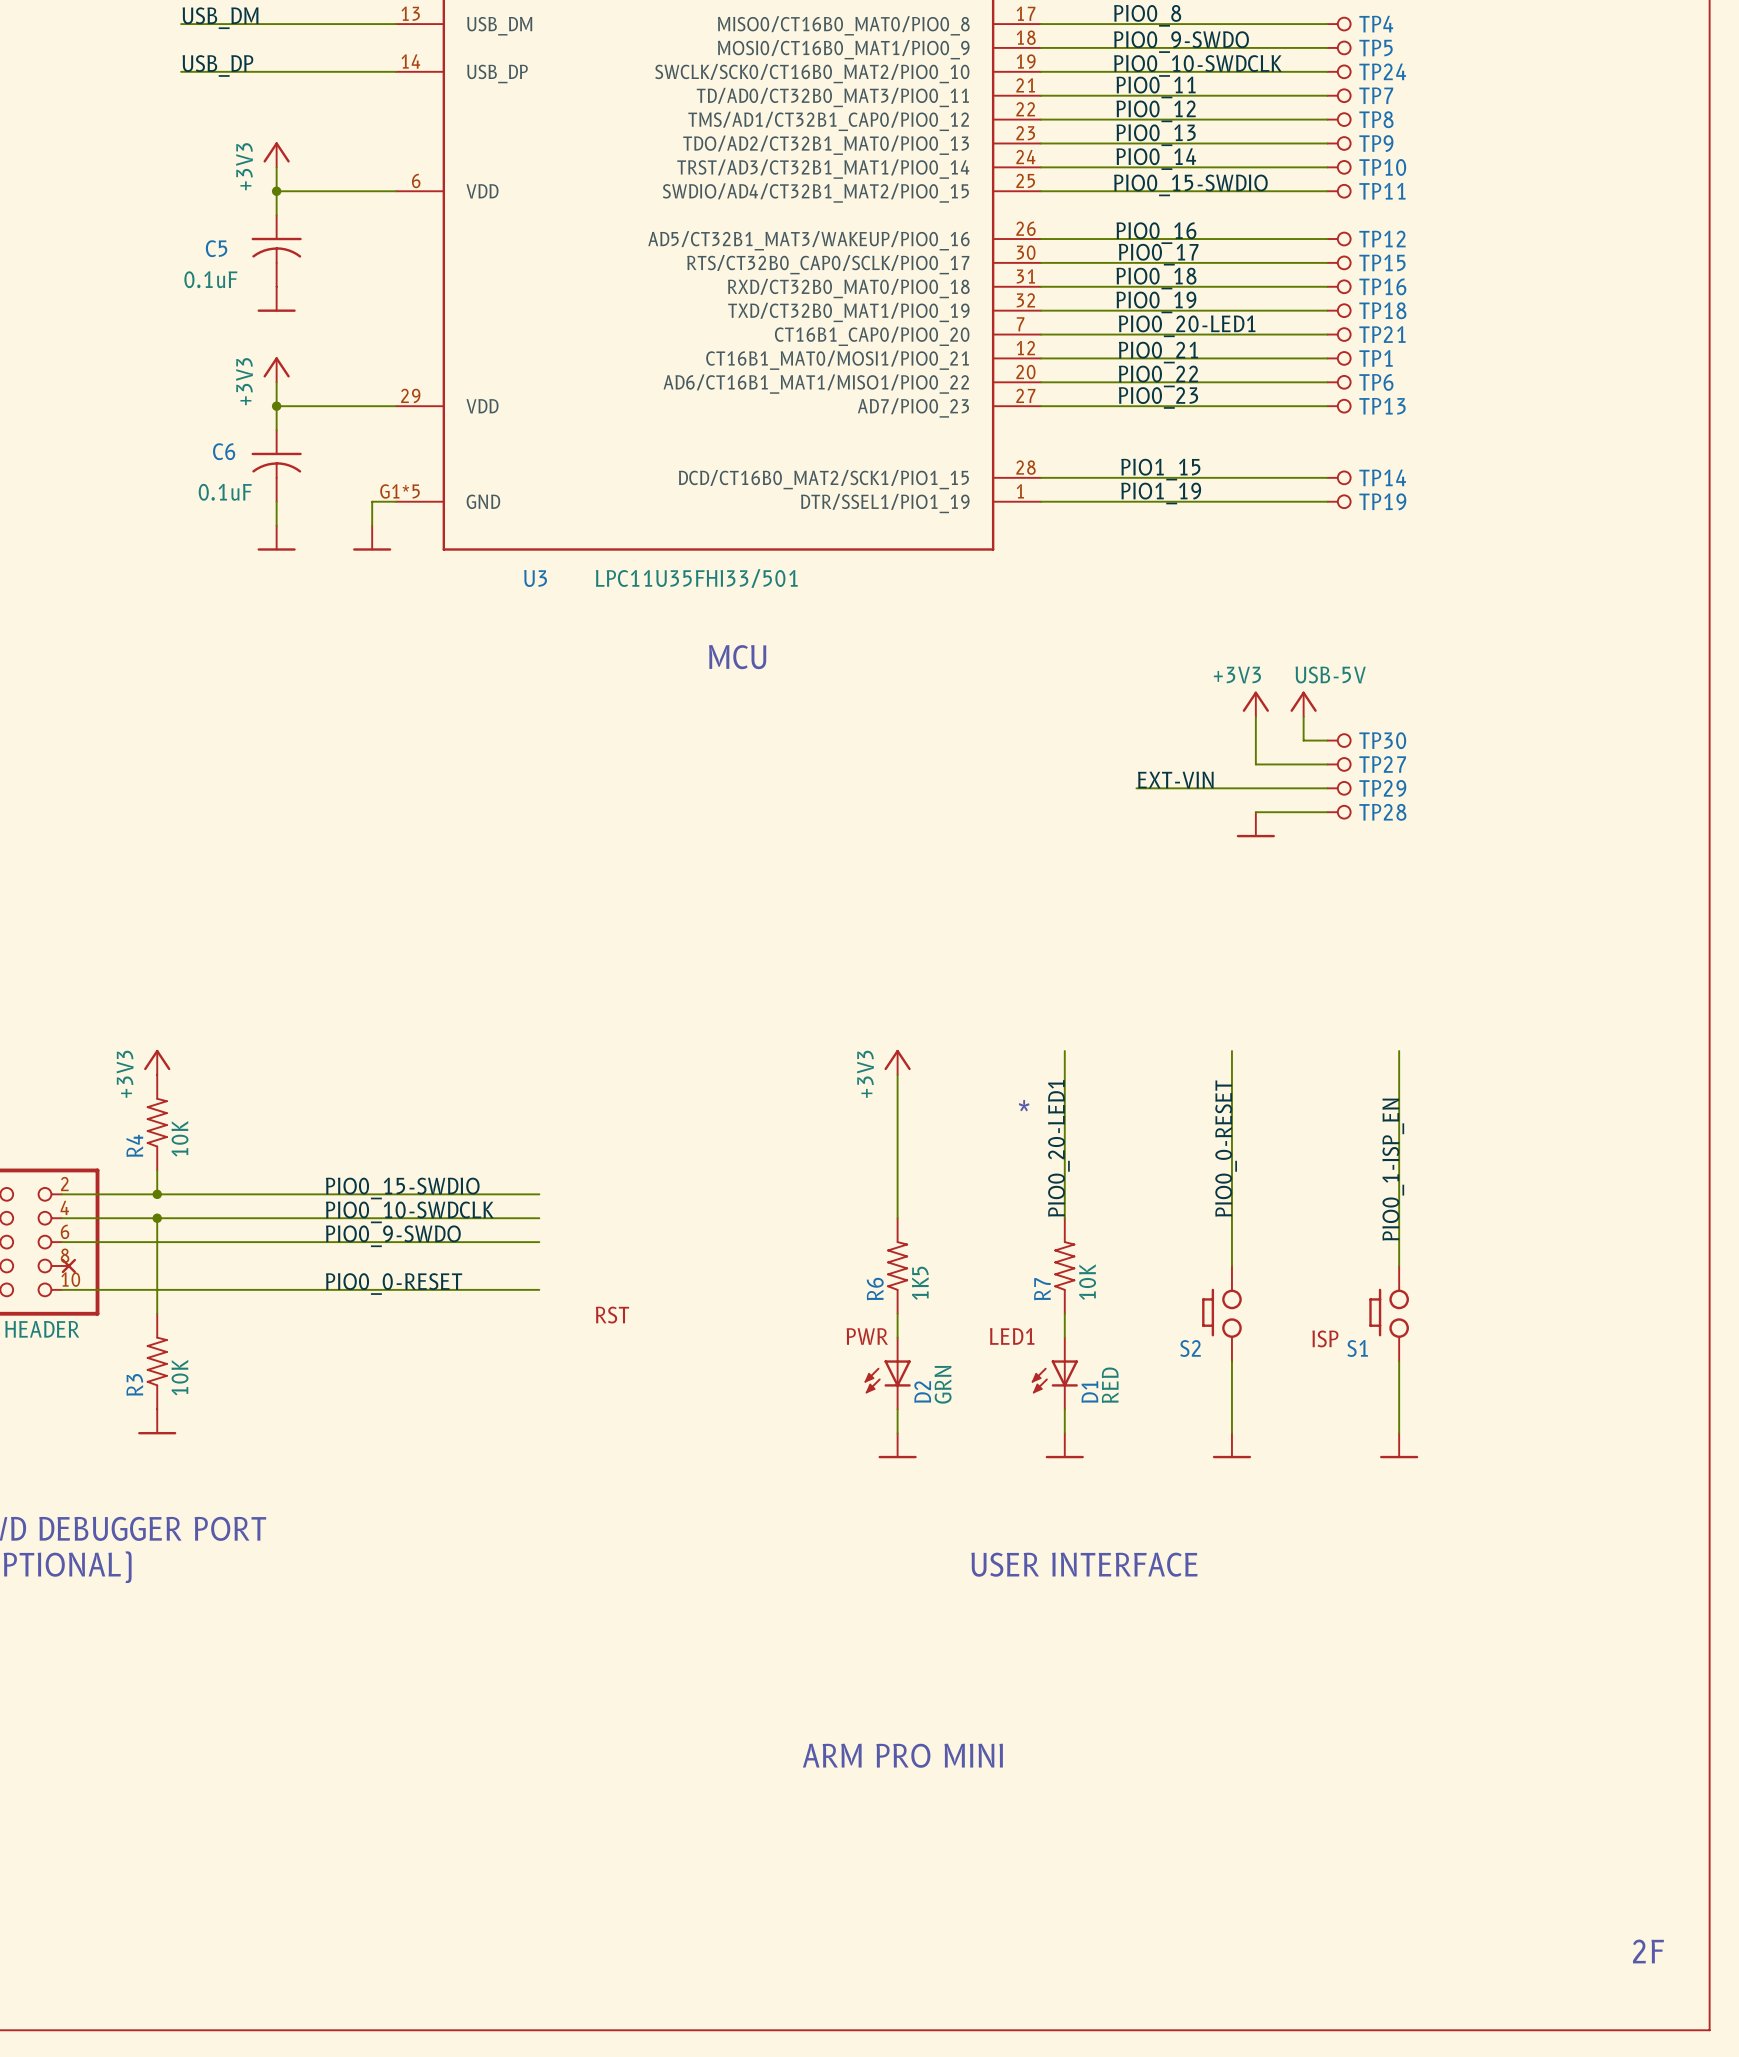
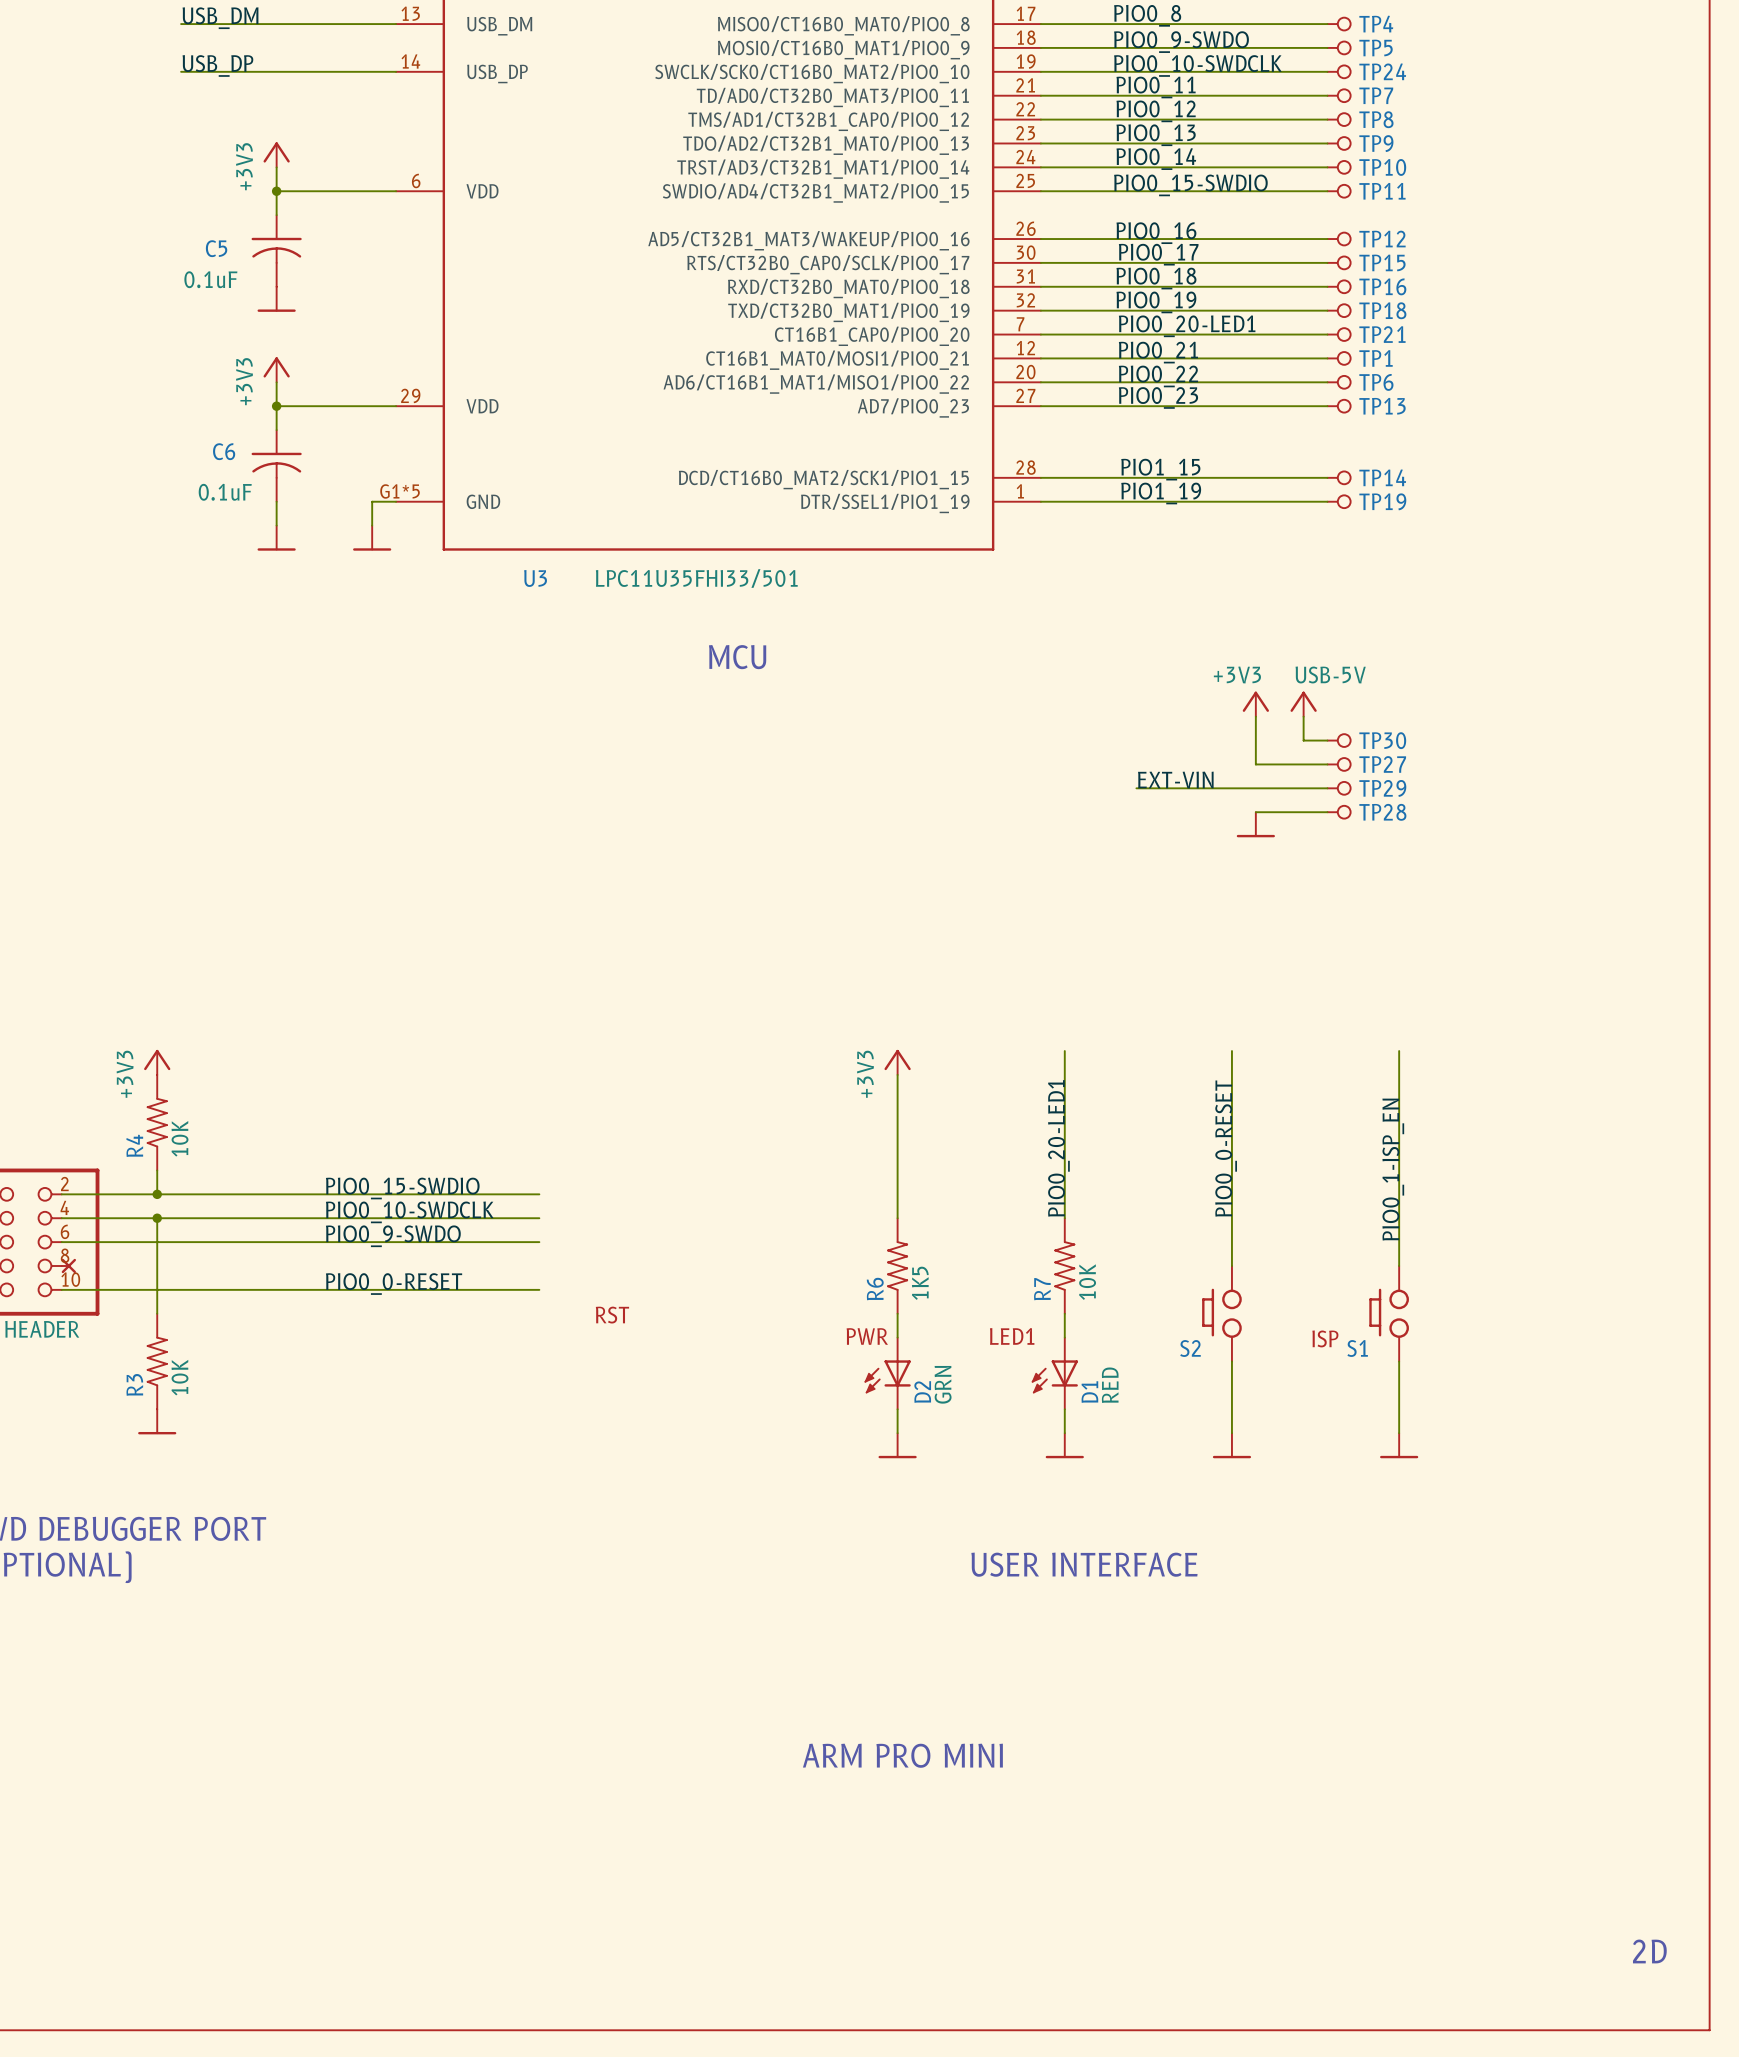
text: * (1024, 1105) -> none
text: 2F (1648, 1951) -> 2D (1649, 1951)

